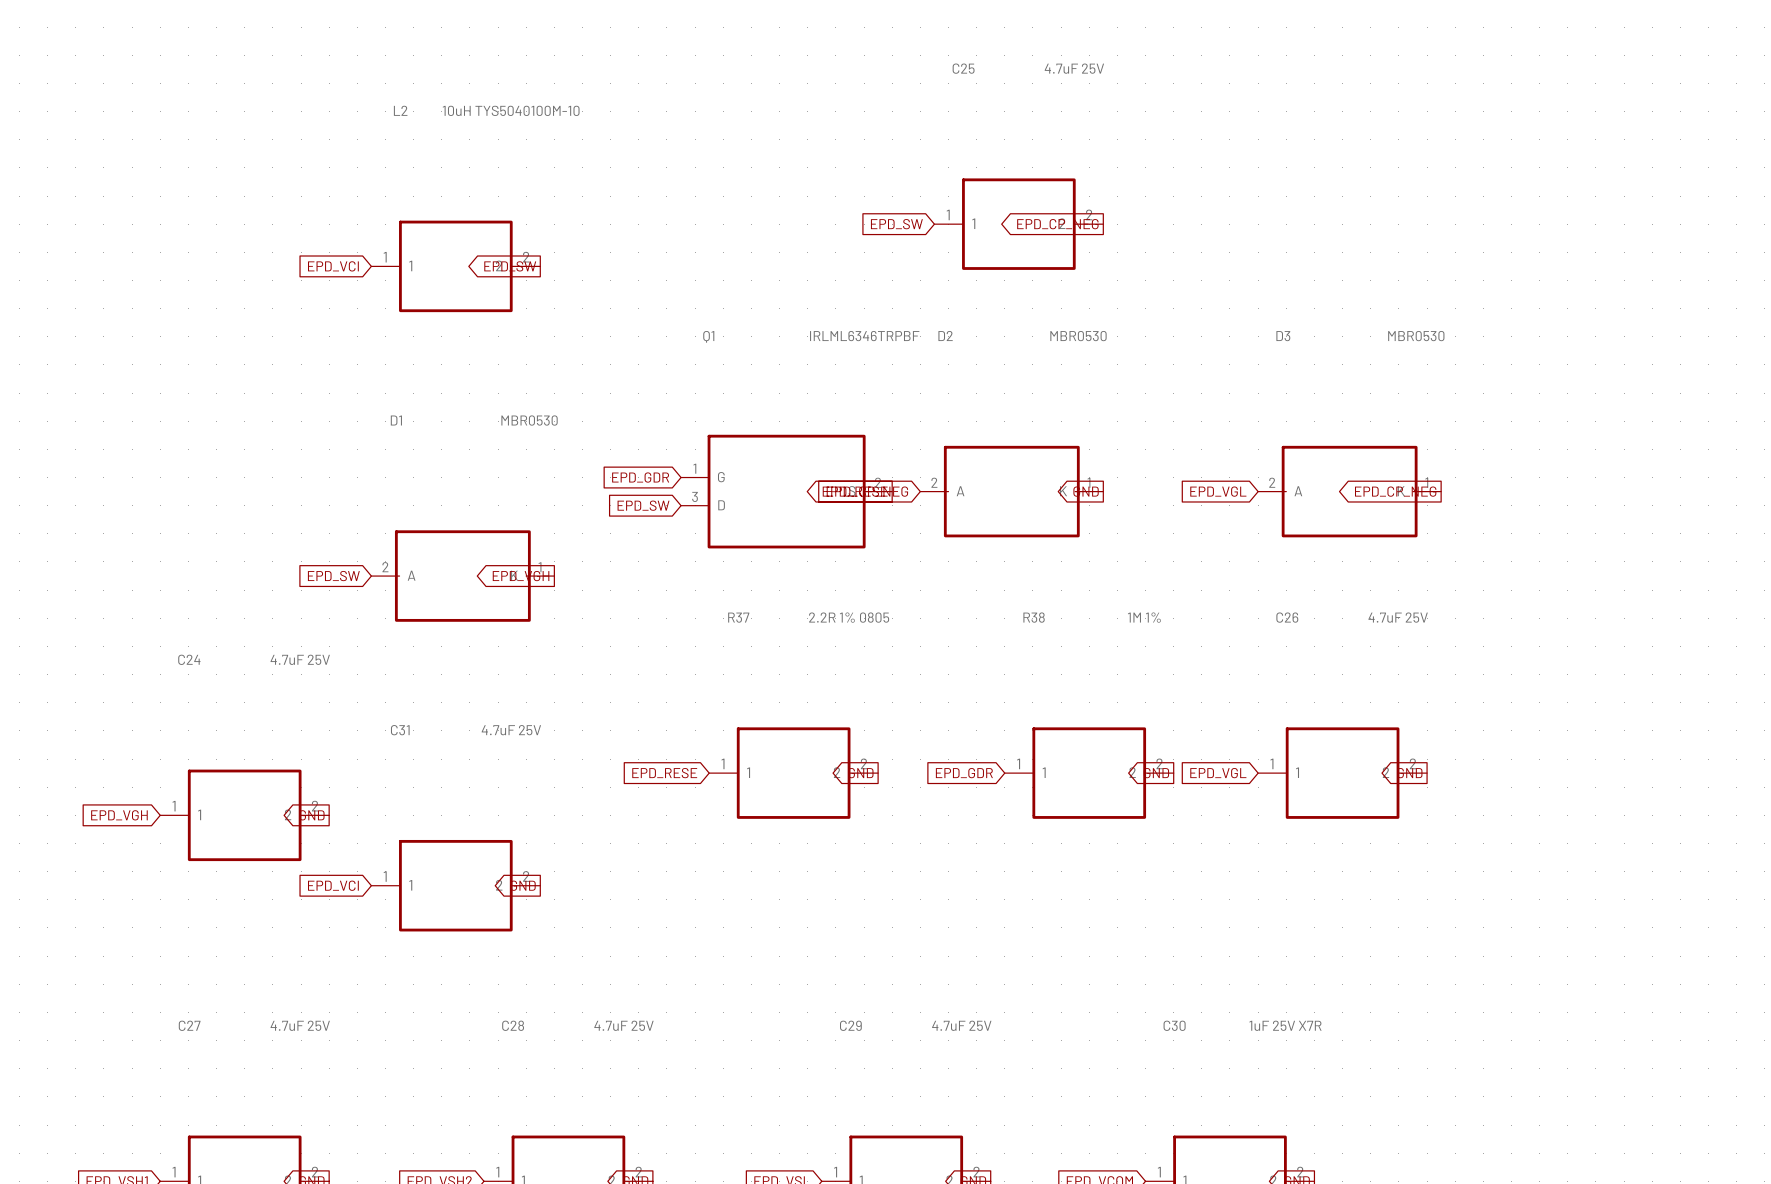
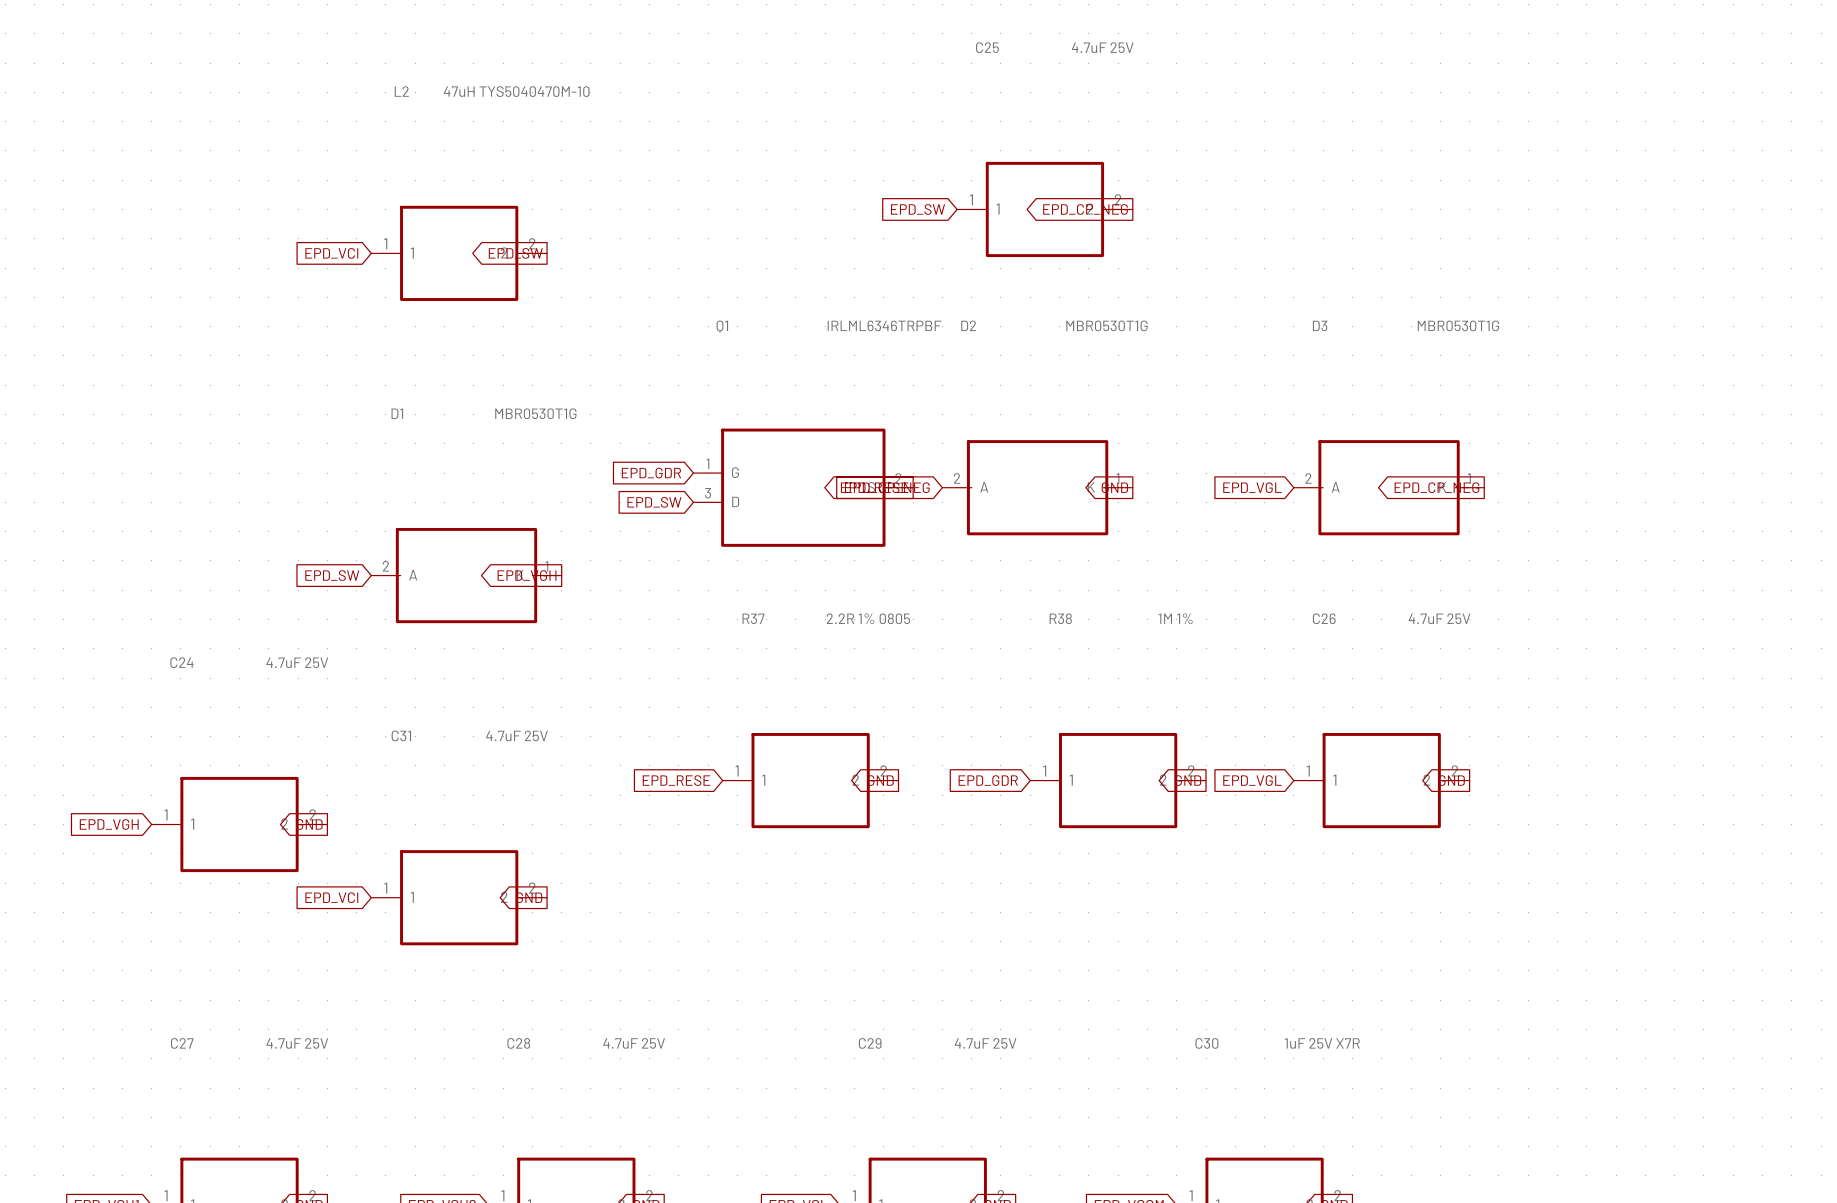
L2 value: 10uH TYS5040100M-10 (511, 110) -> 47uH TYS5040470M-10 (516, 91)
D2 value: MBR0530 (1078, 336) -> MBR0530T1G (1106, 325)
D3 value: MBR0530 (1416, 336) -> MBR0530T1G (1458, 325)
D1 value: MBR0530 (529, 420) -> MBR0530T1G (535, 413)

